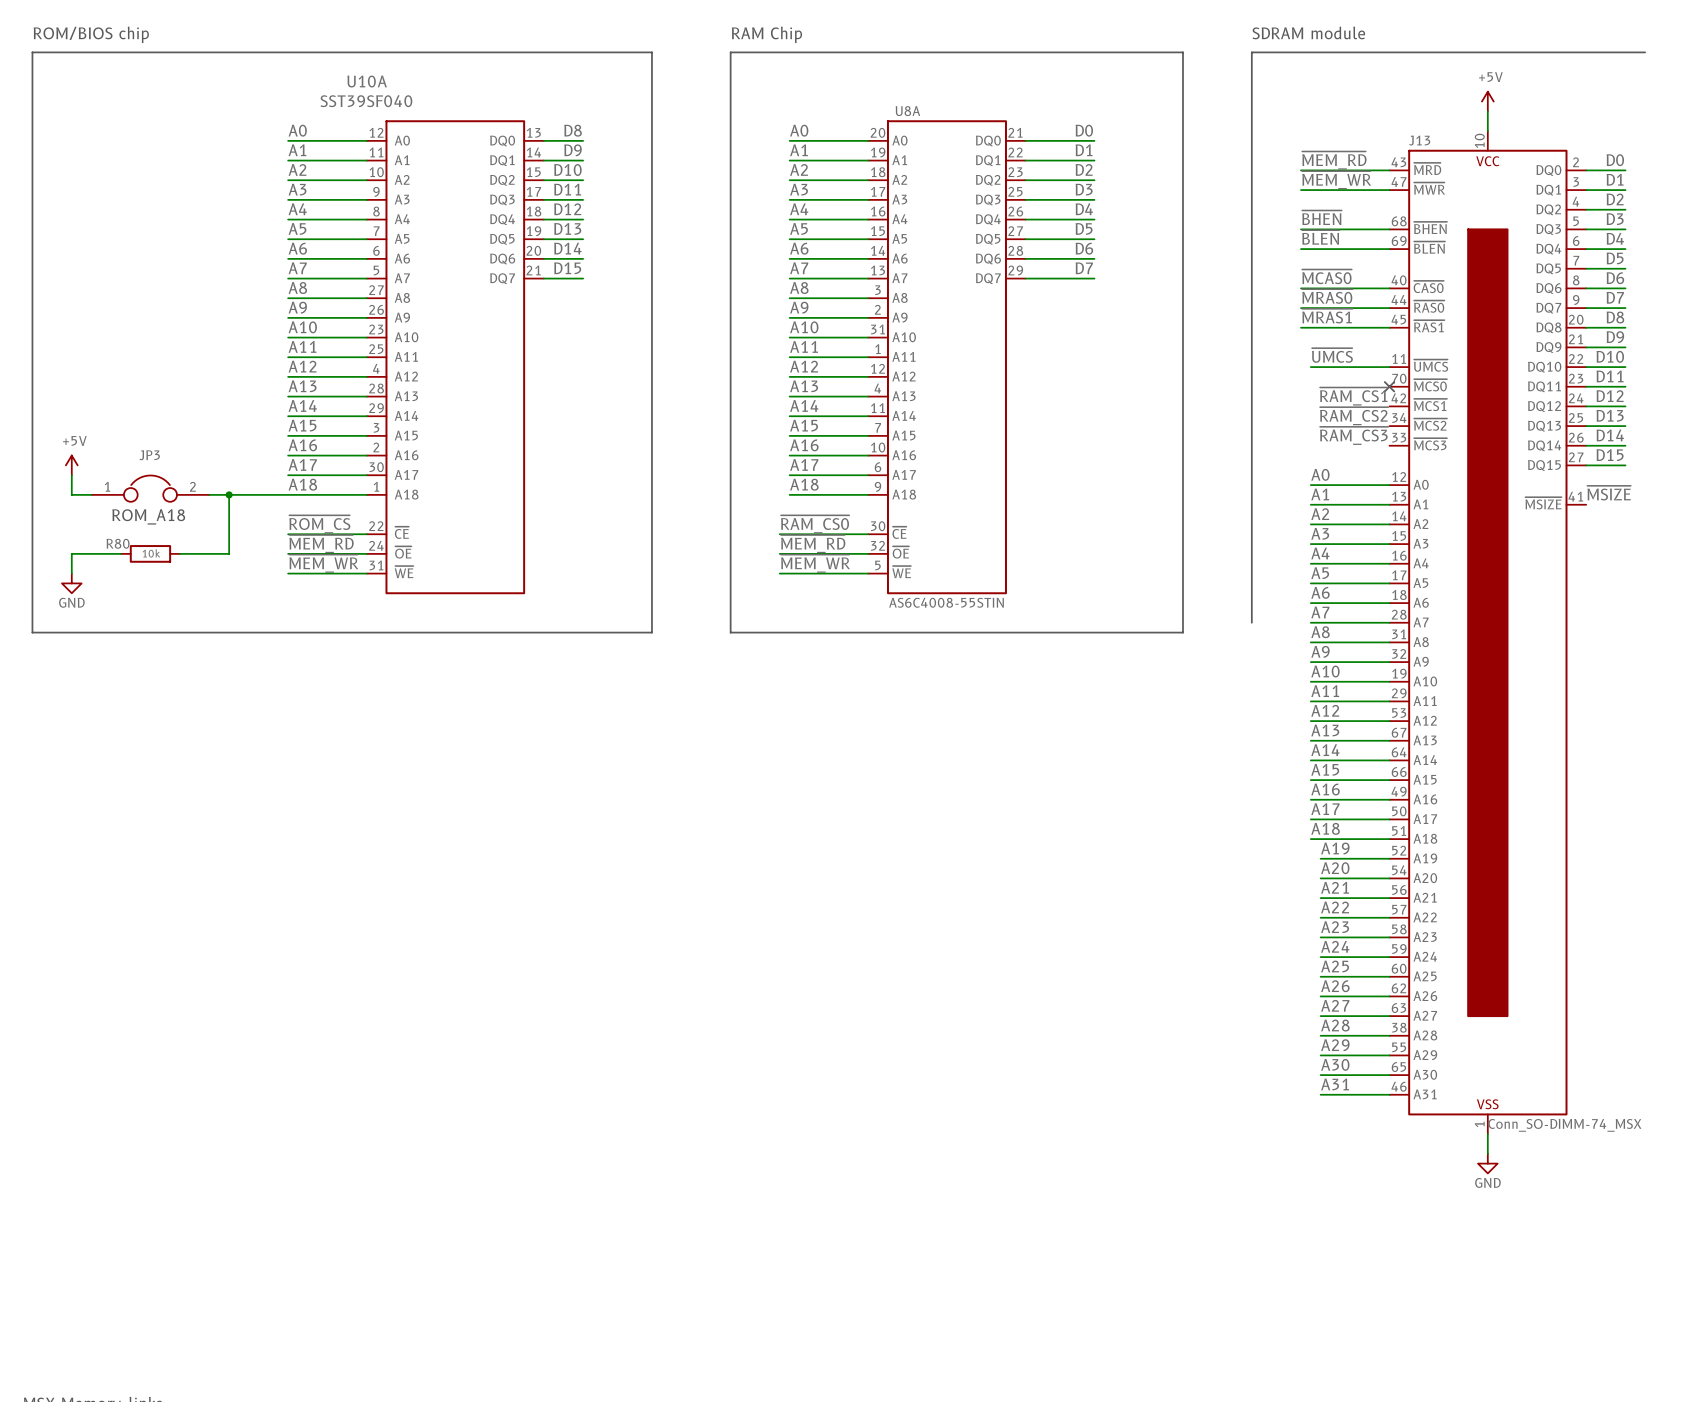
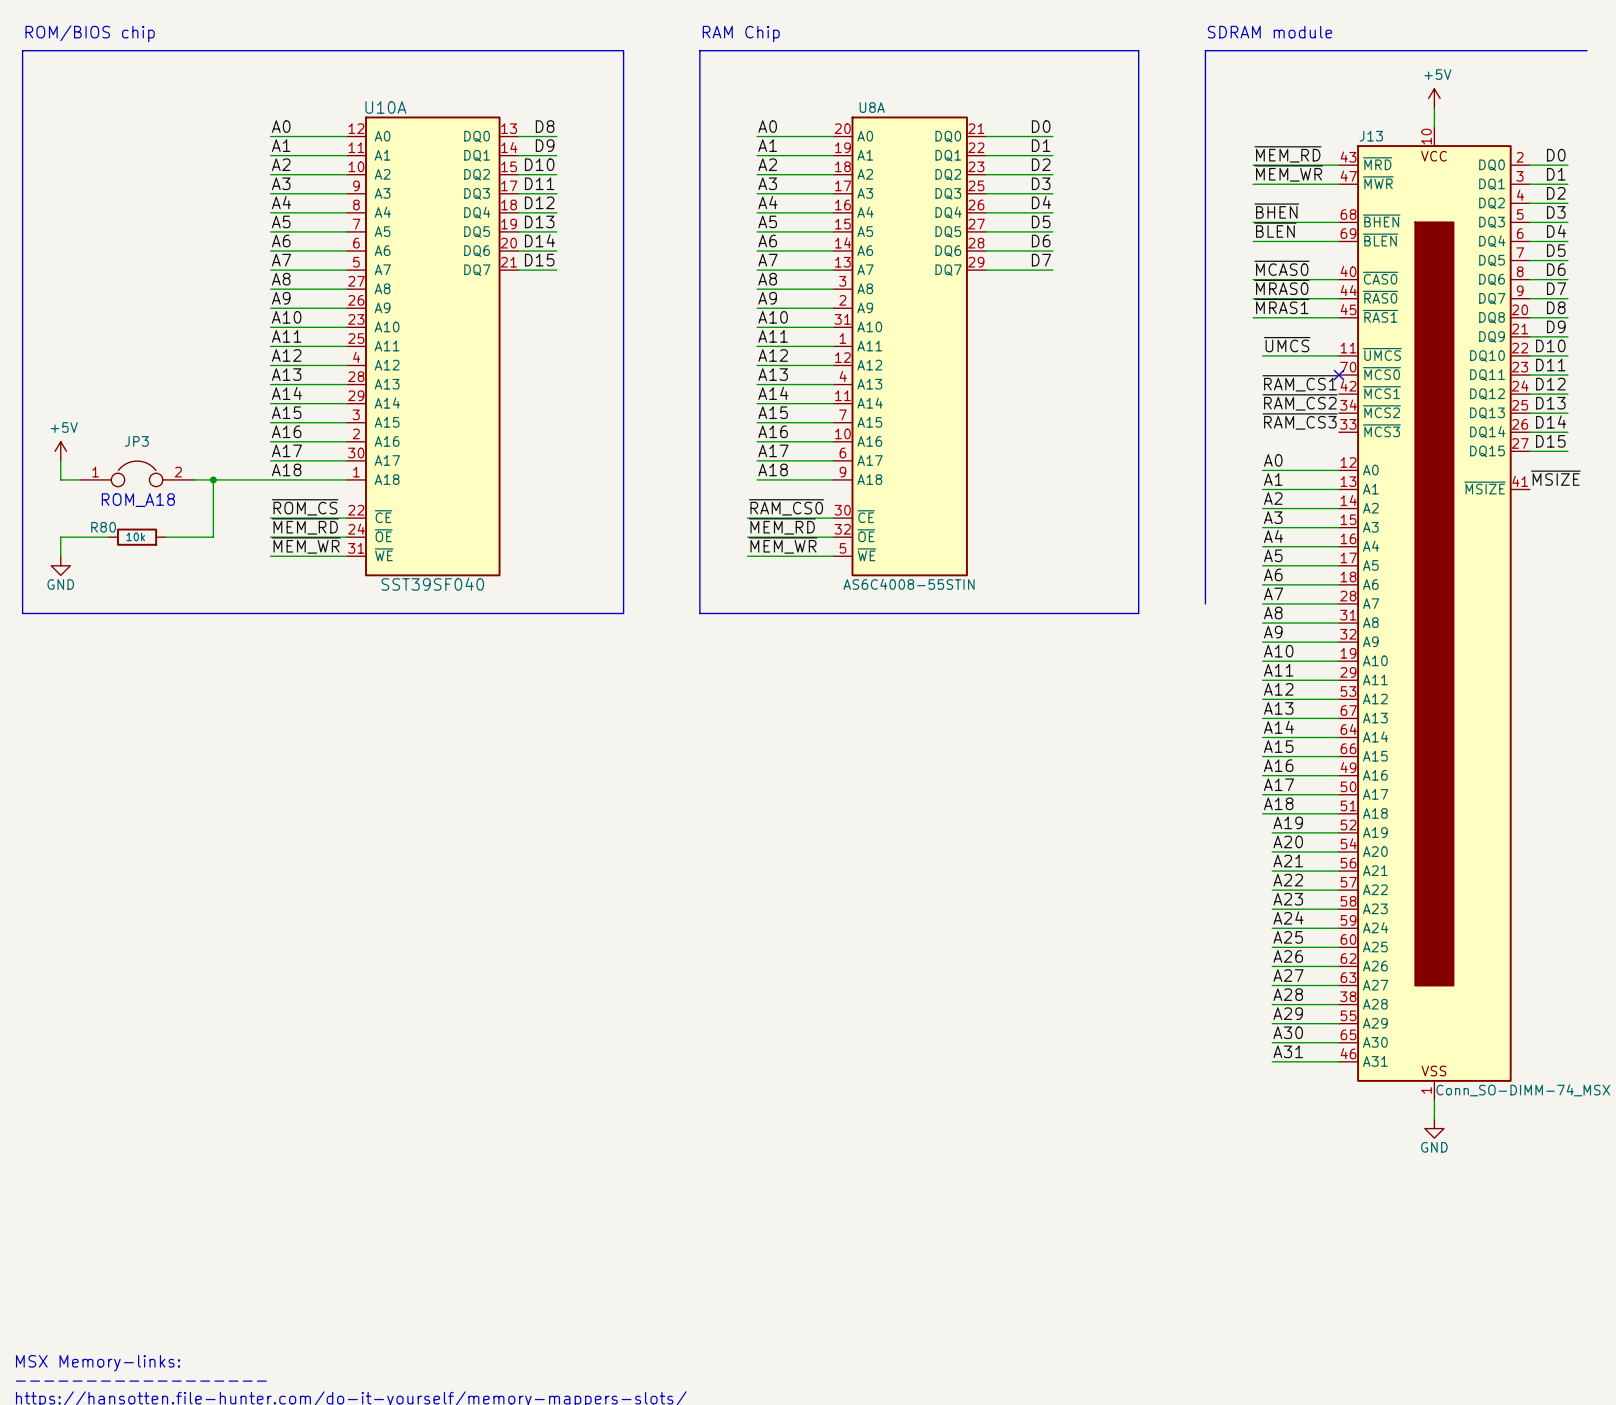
U10A name position: U10A (367, 81) -> U10A (385, 107)
U10A value position: SST39SF040 (366, 101) -> SST39SF040 (432, 584)

